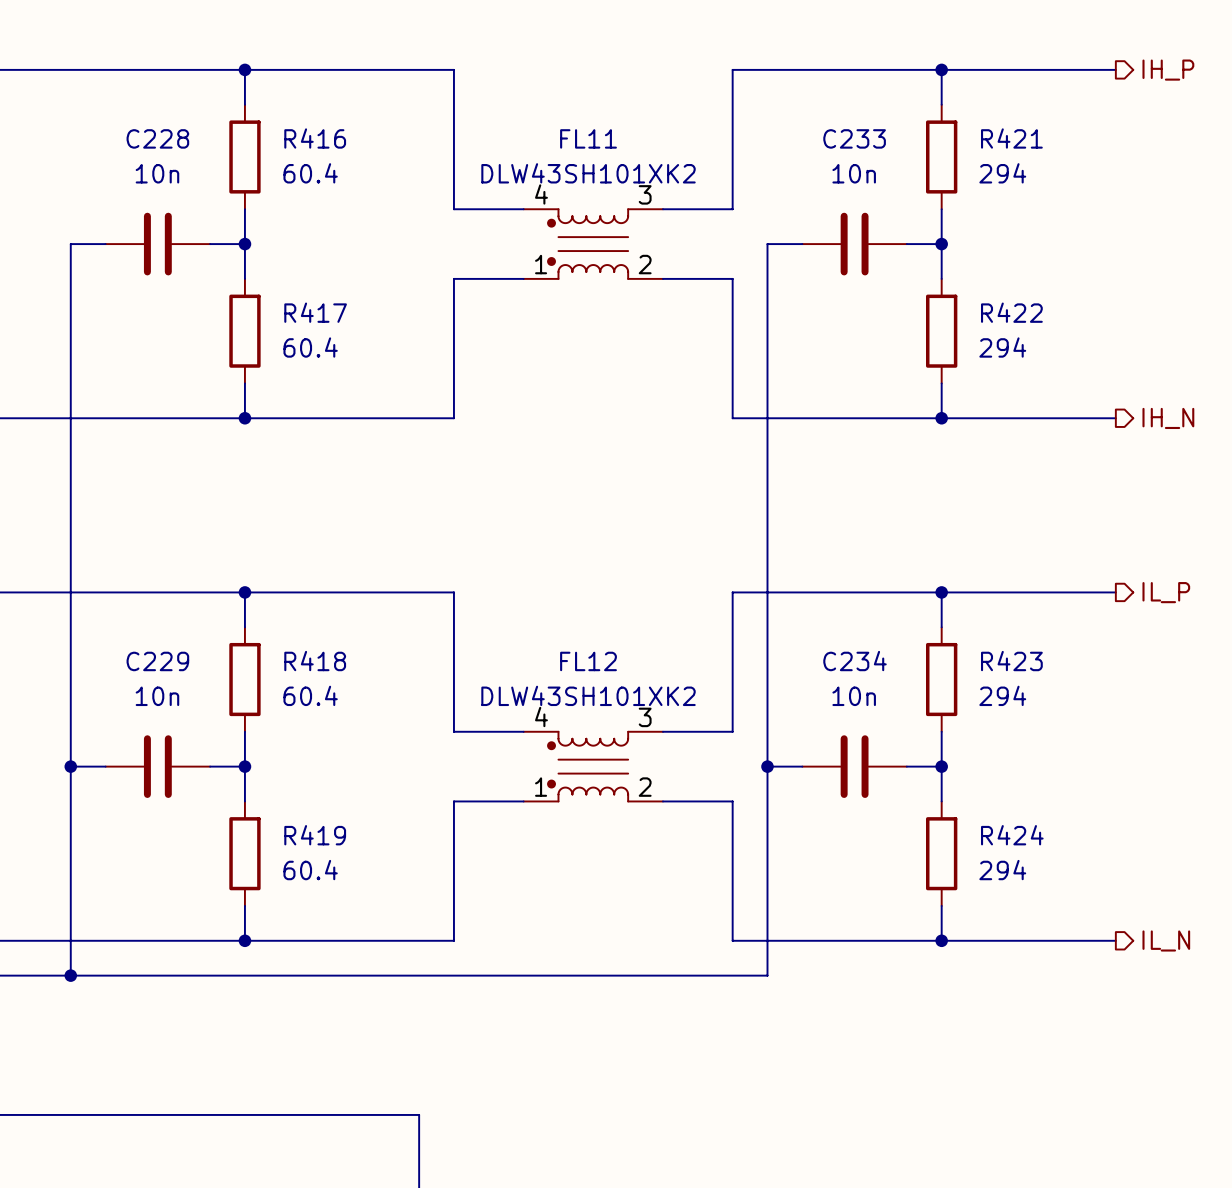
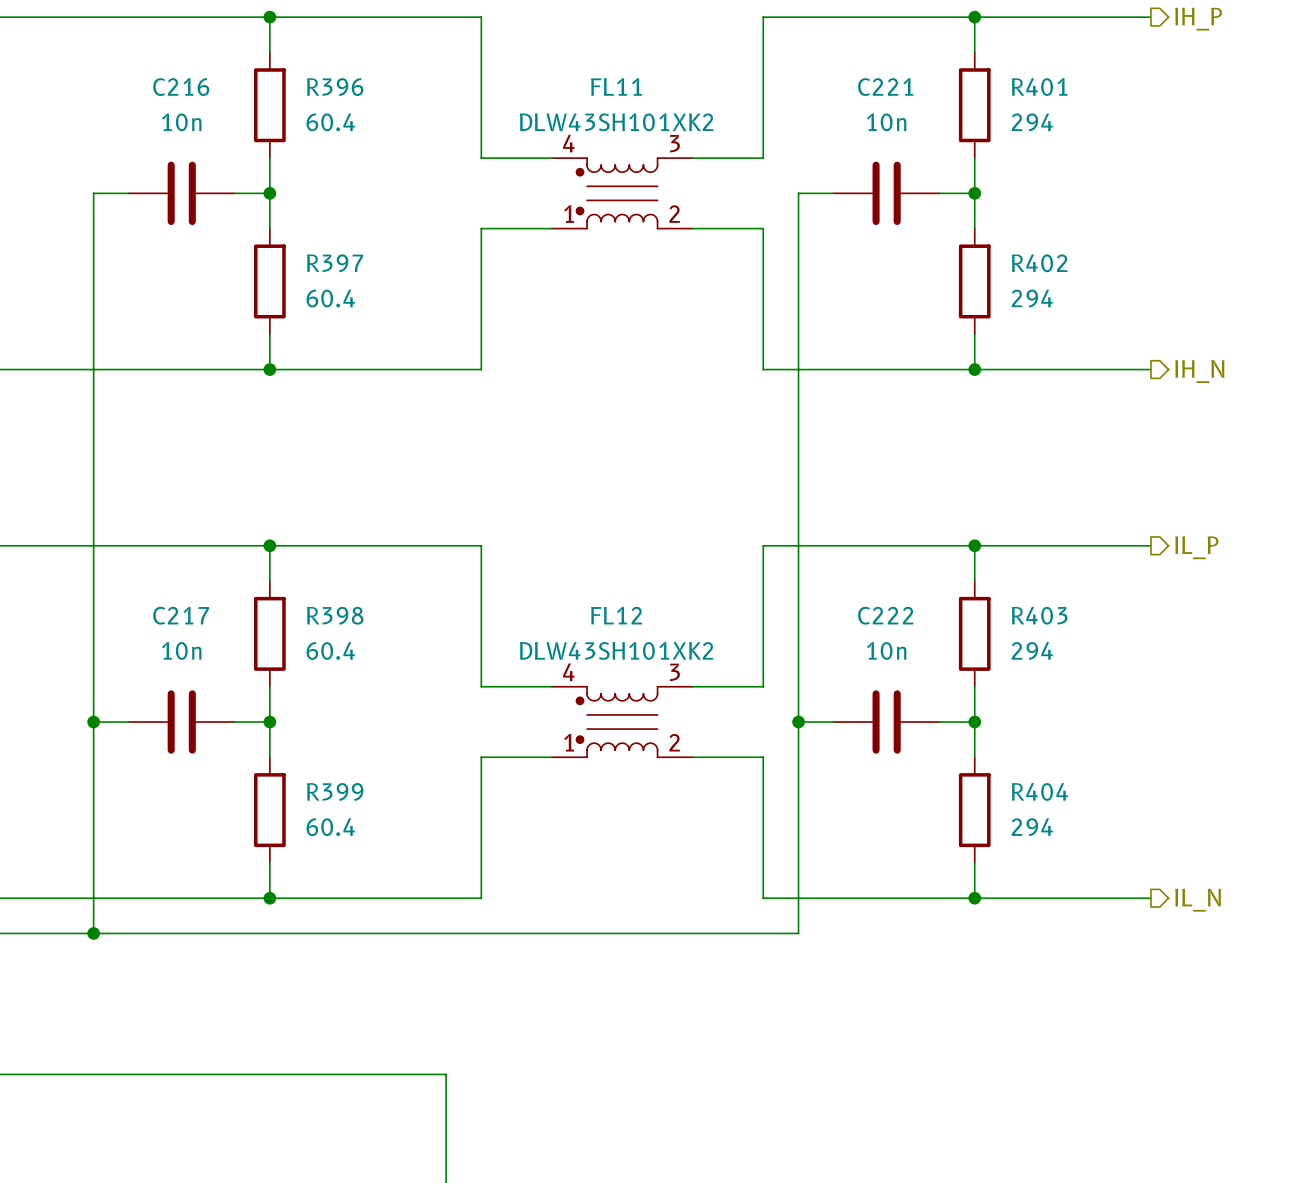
C228 name: C228 (157, 138) -> C216 (181, 87)
R416 name: R416 (315, 138) -> R396 (335, 87)
C233 name: C233 (854, 138) -> C221 (885, 87)
R421 name: R421 (1011, 138) -> R401 (1039, 87)
R417 name: R417 (315, 312) -> R397 (334, 263)
R422 name: R422 (1011, 312) -> R402 (1039, 263)
C229 name: C229 (157, 661) -> C217 (181, 615)
R418 name: R418 (315, 661) -> R398 (335, 615)
C234 name: C234 (855, 661) -> C222 (885, 615)
R423 name: R423 (1011, 661) -> R403 (1039, 615)
R419 name: R419 (315, 835) -> R399 (335, 791)
R424 name: R424 (1012, 835) -> R404 (1039, 791)

